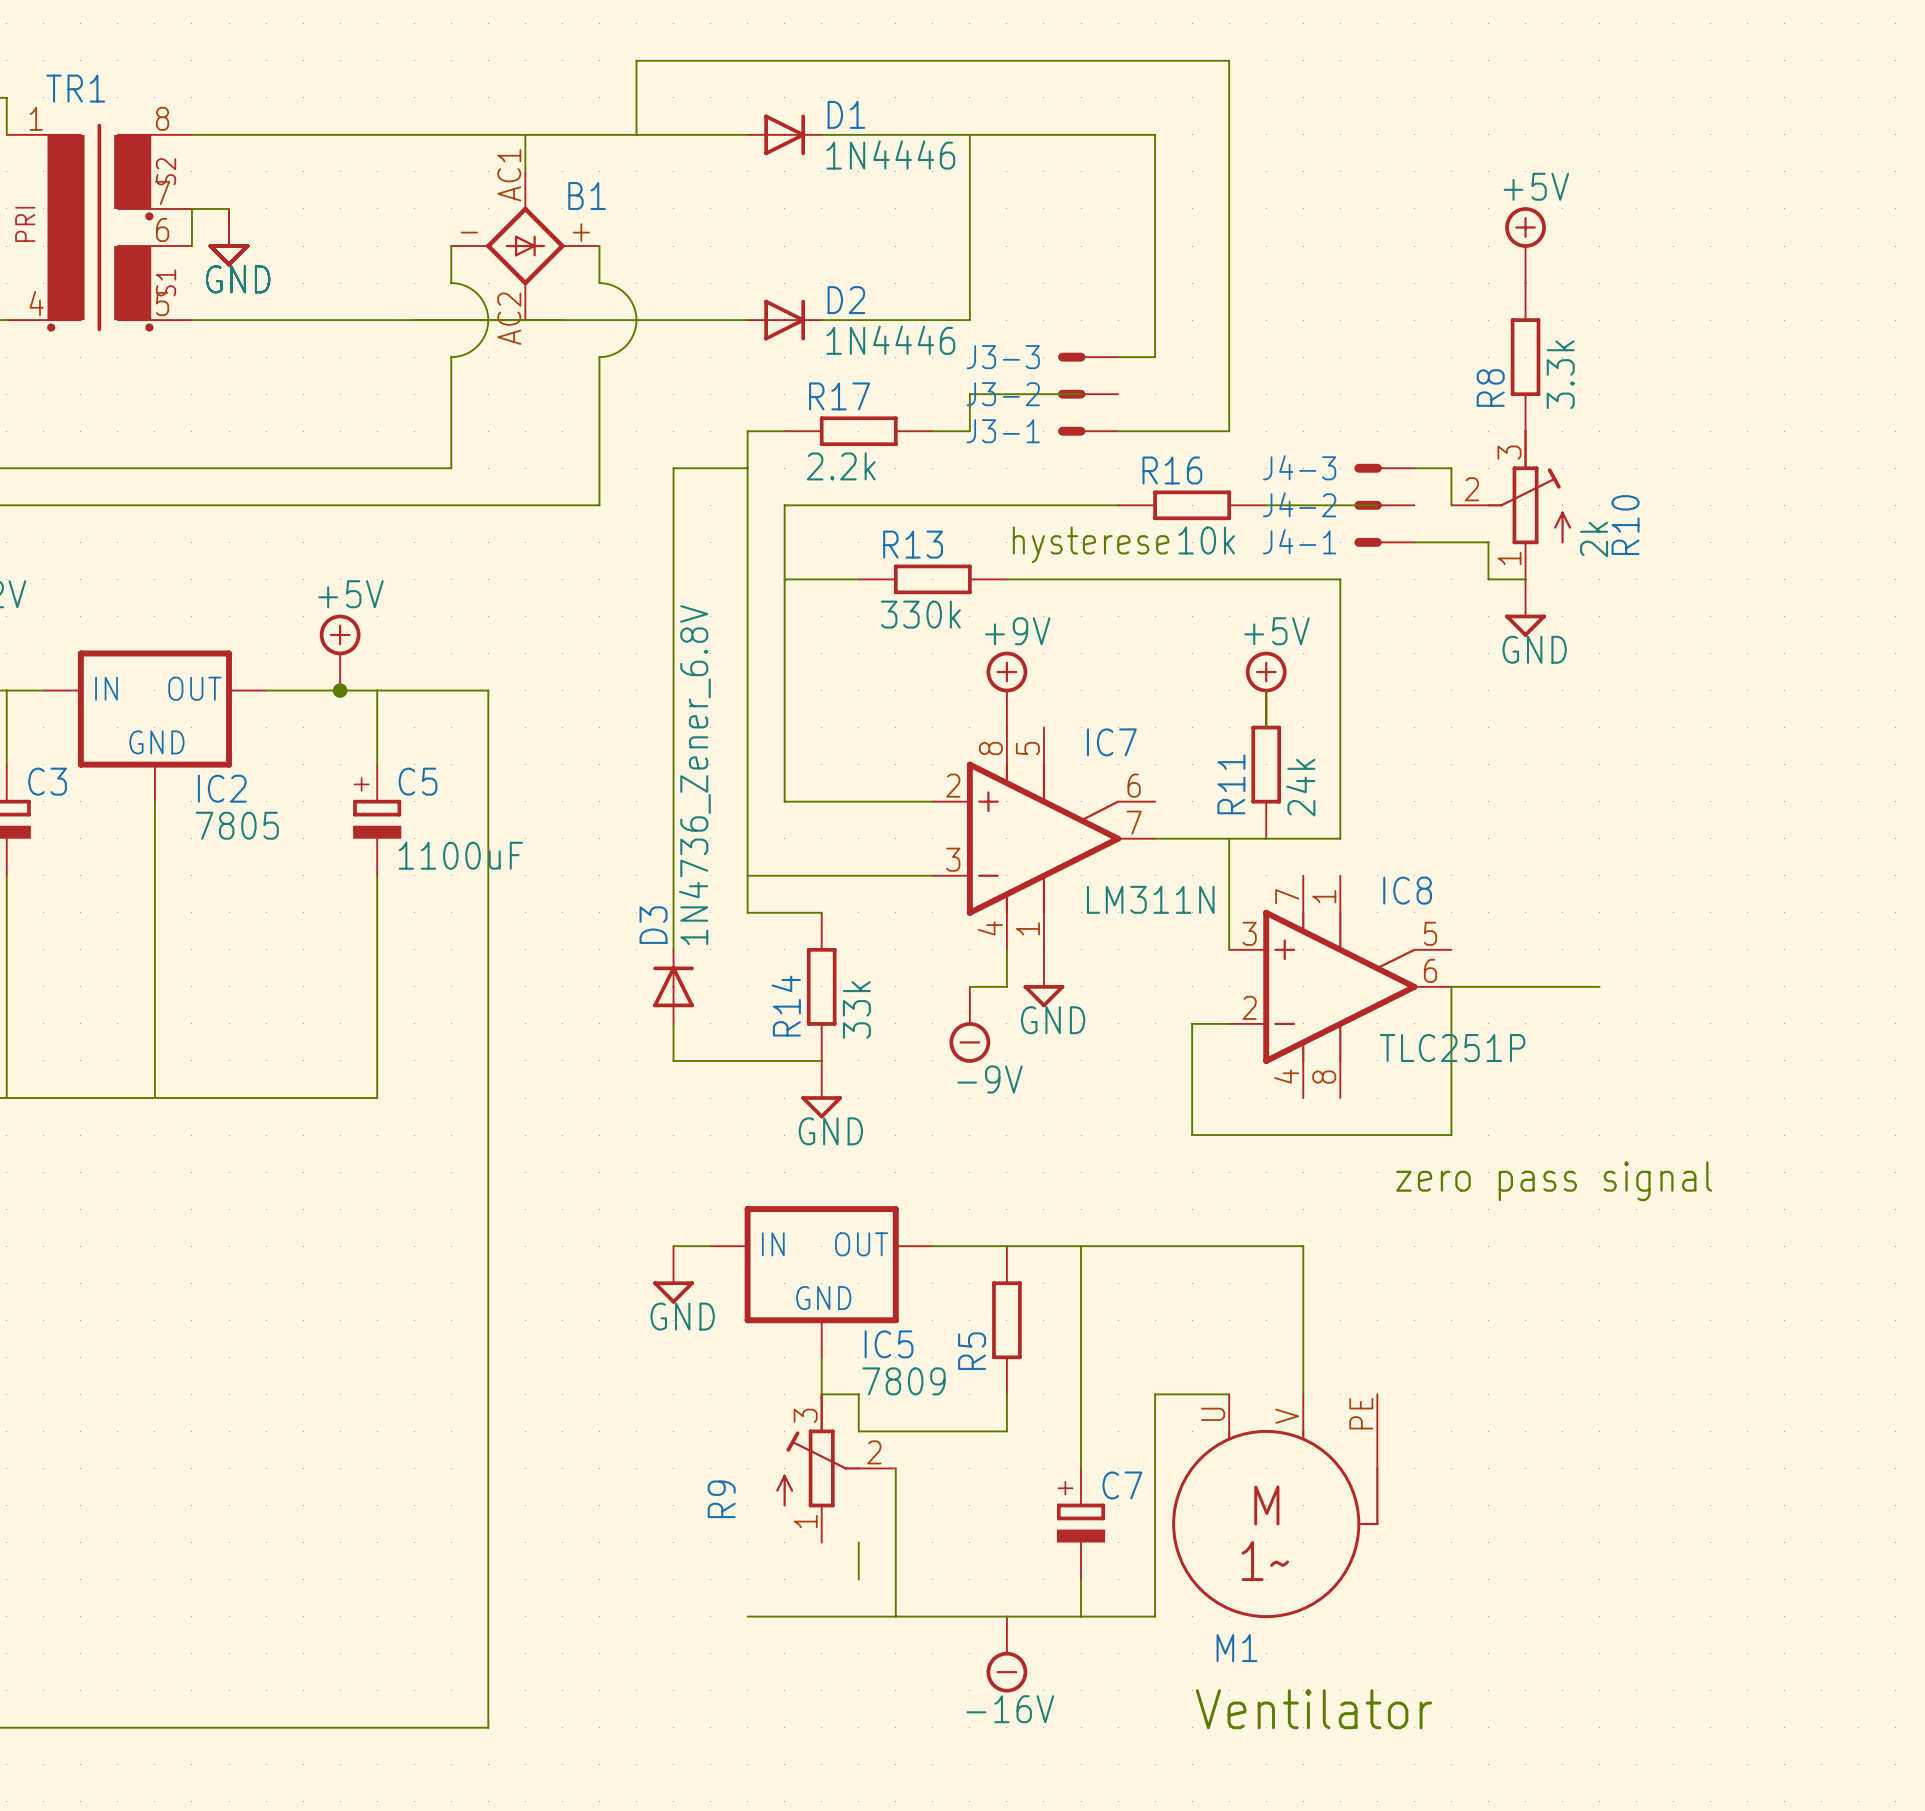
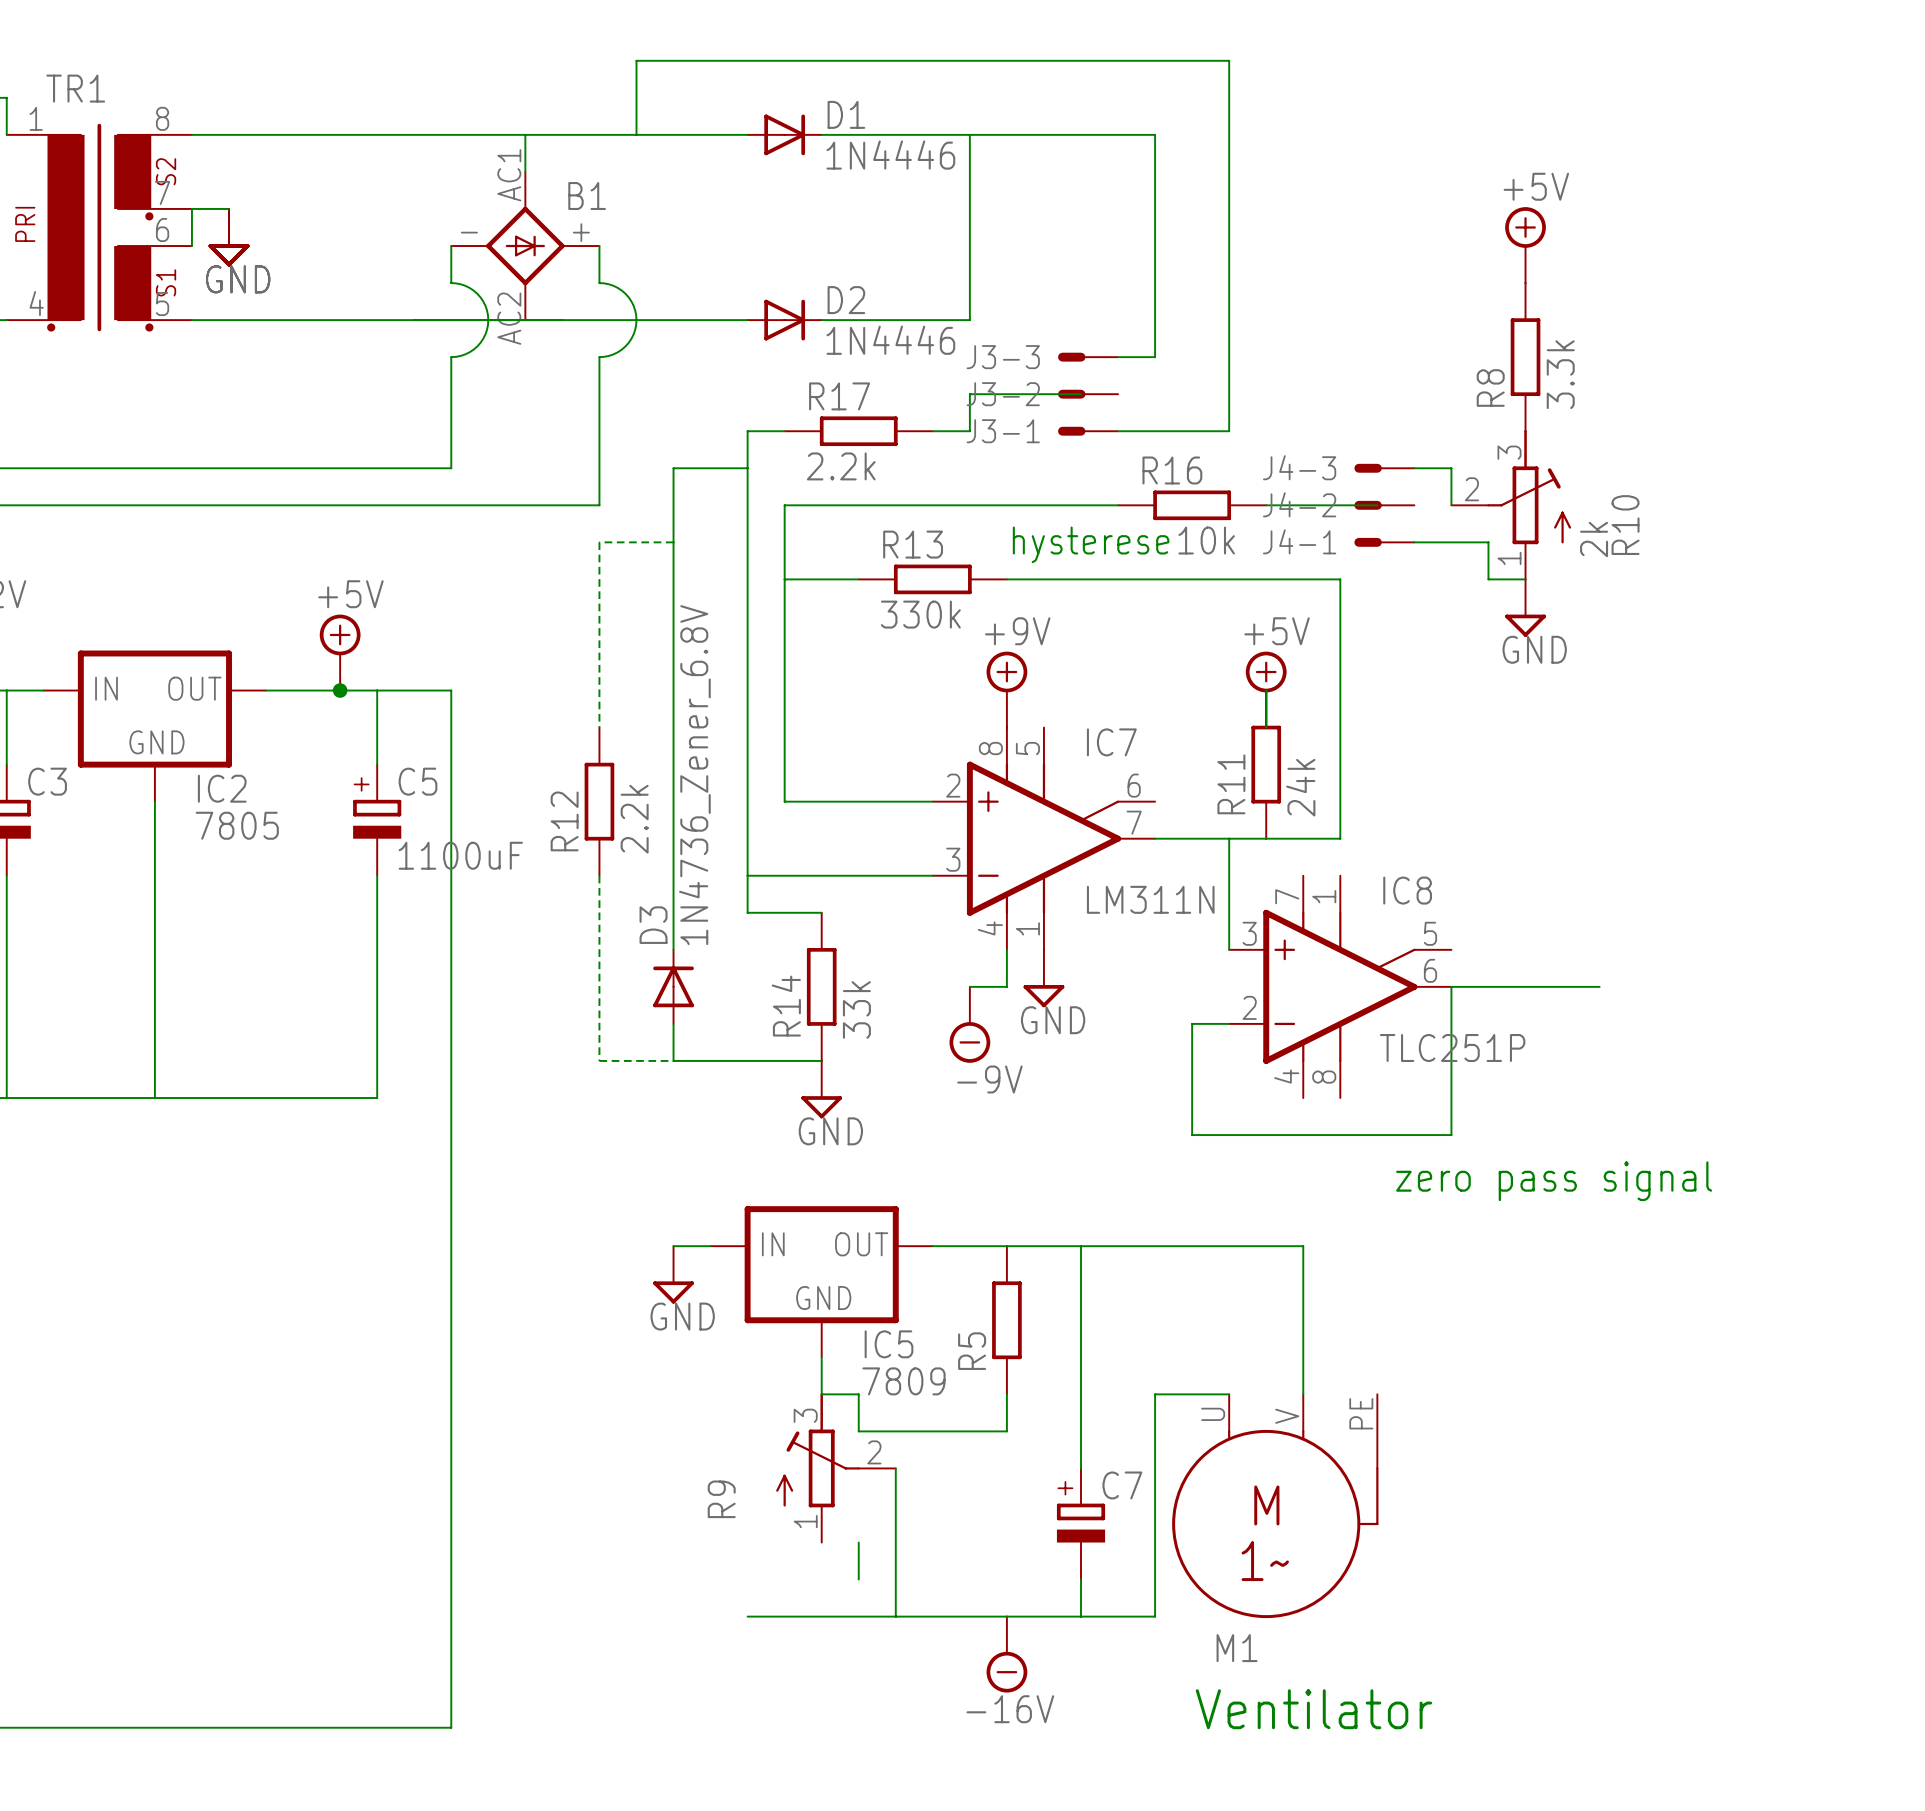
wire: none -> (673, 542) (599, 542) (599, 727)
wire: (451, 690) (488, 690) (488, 1727) (451, 1727) -> (451, 690) (451, 1727)
R12: none -> 2.2k (599, 801)
wire: none -> (599, 875) (599, 1060) (673, 1060)

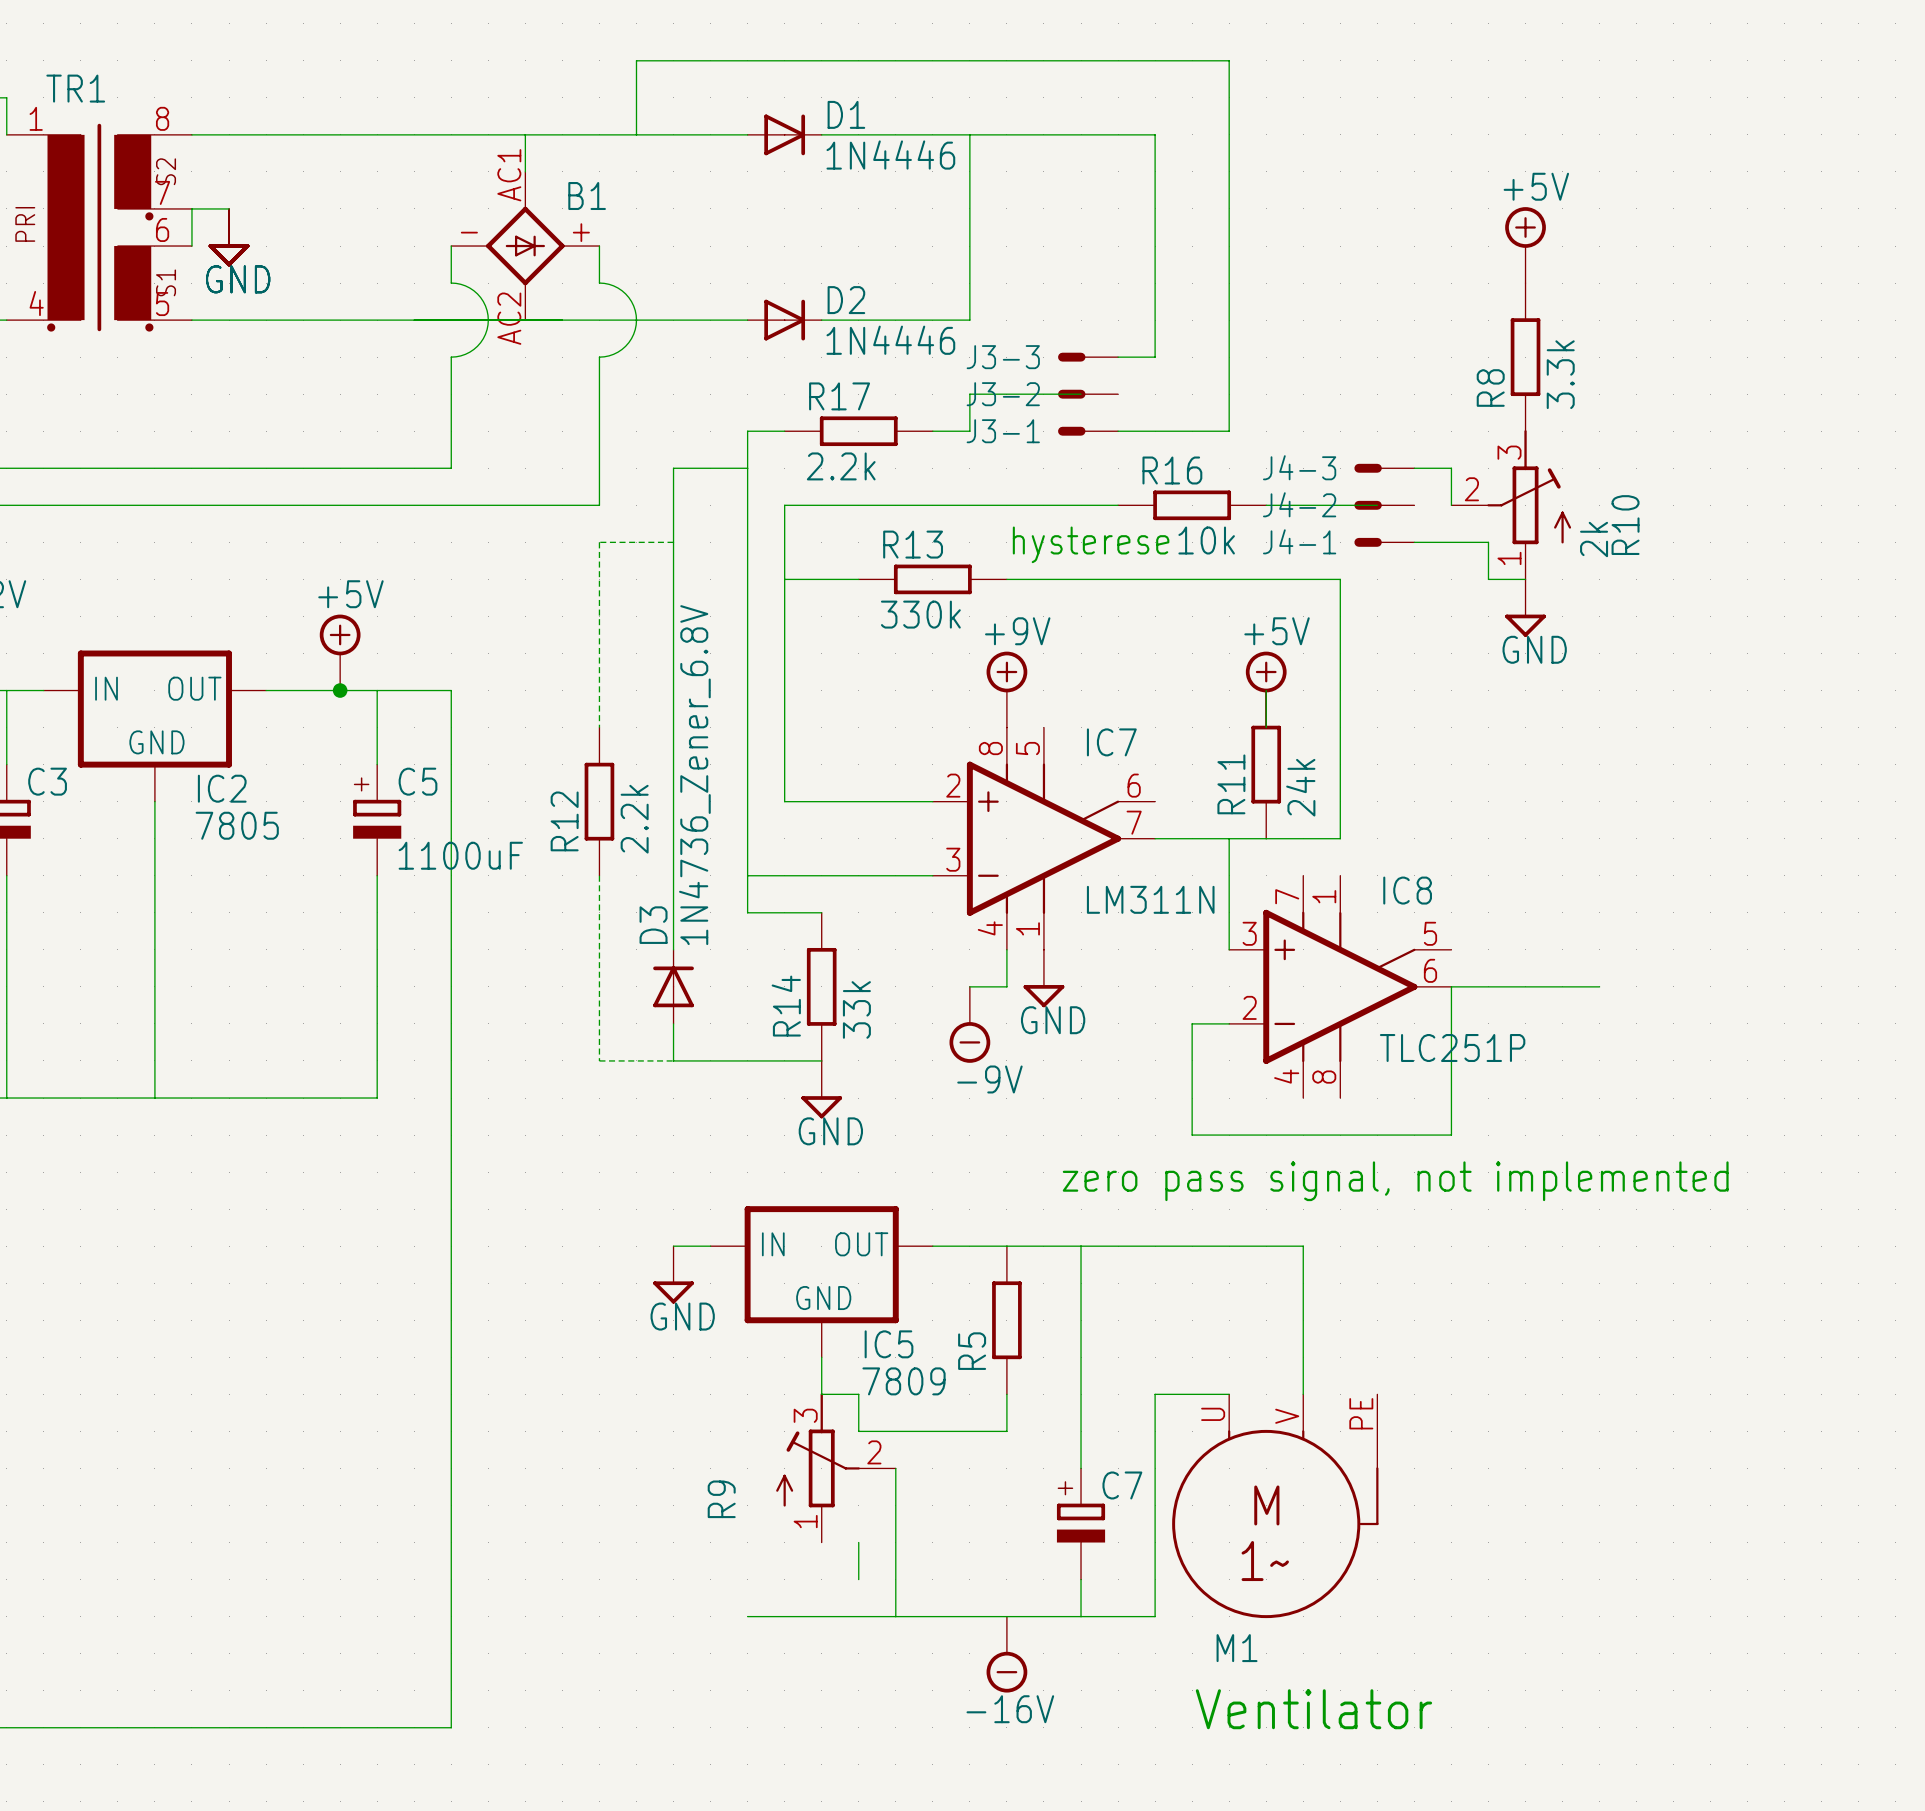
text: zero pass signal (1554, 1181) -> zero pass signal, not implemented (1395, 1181)

